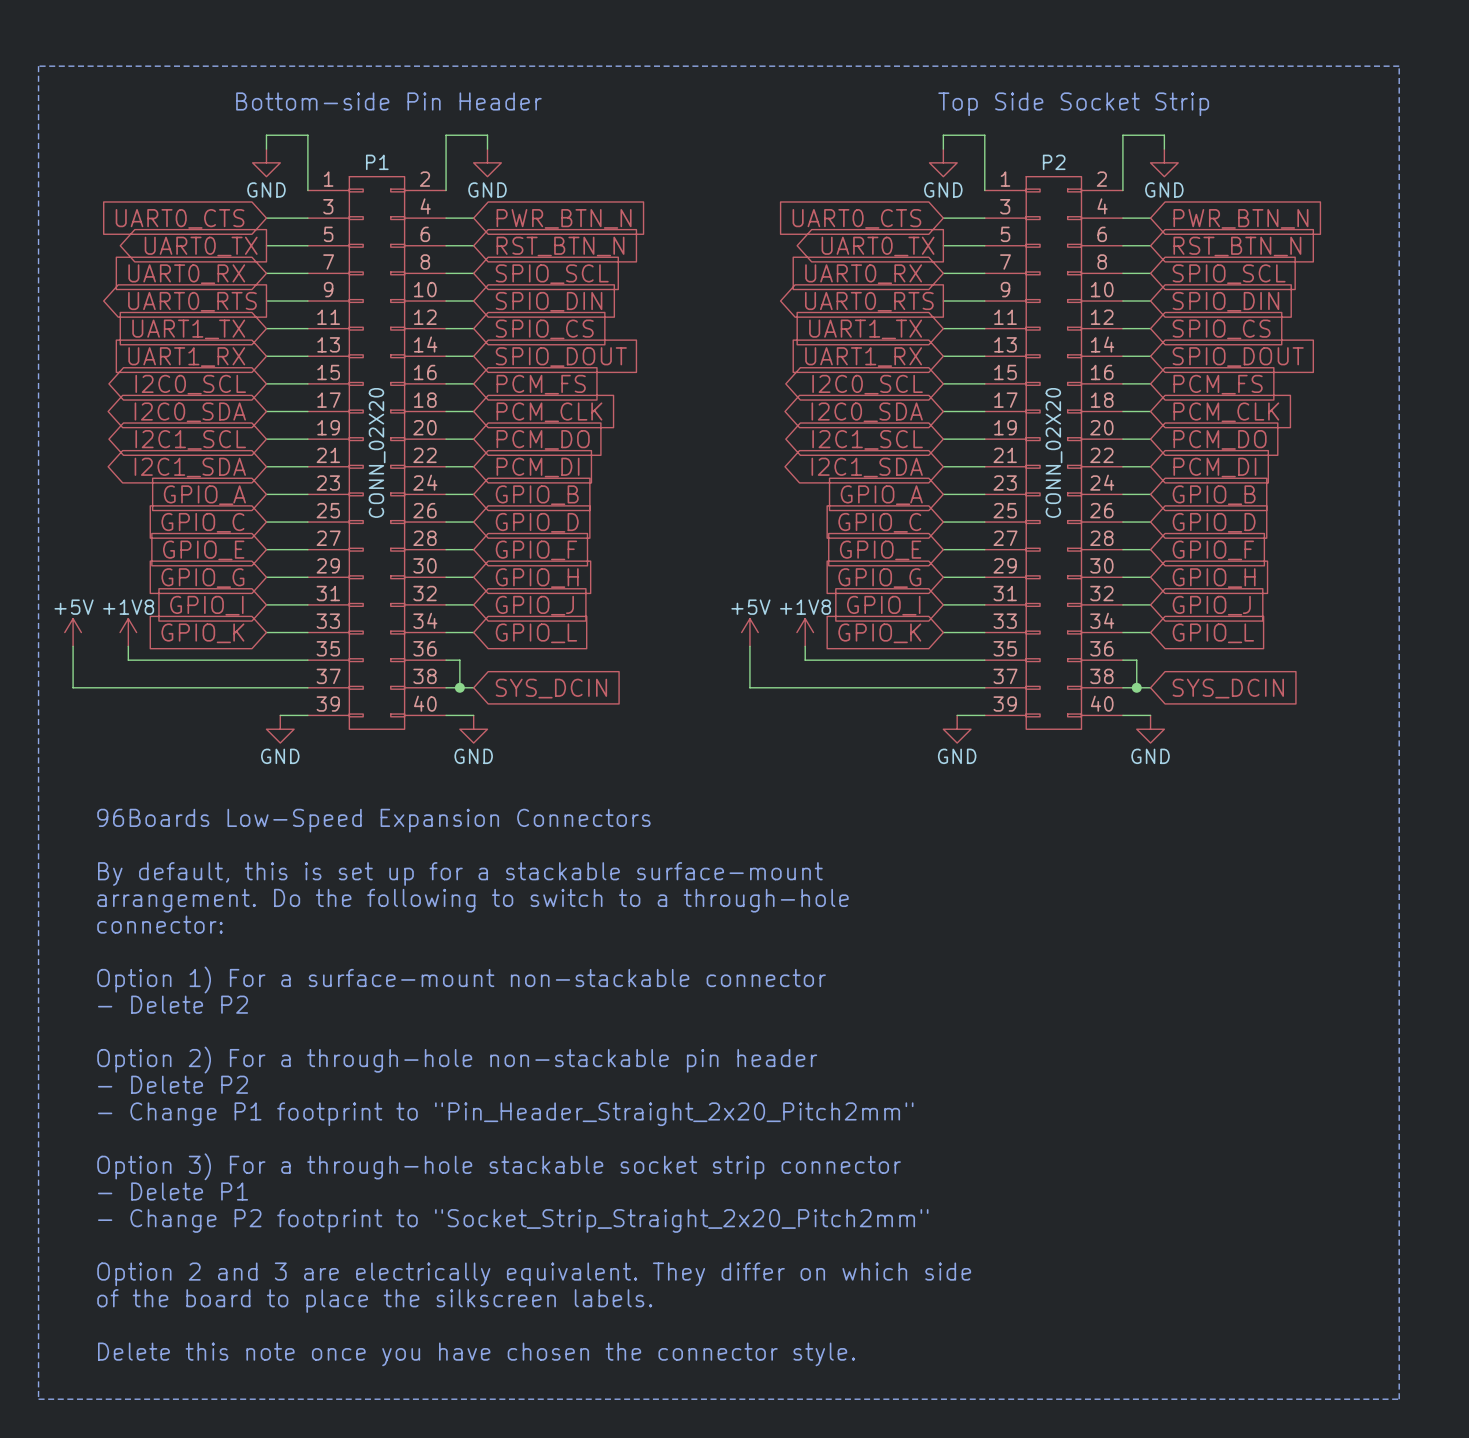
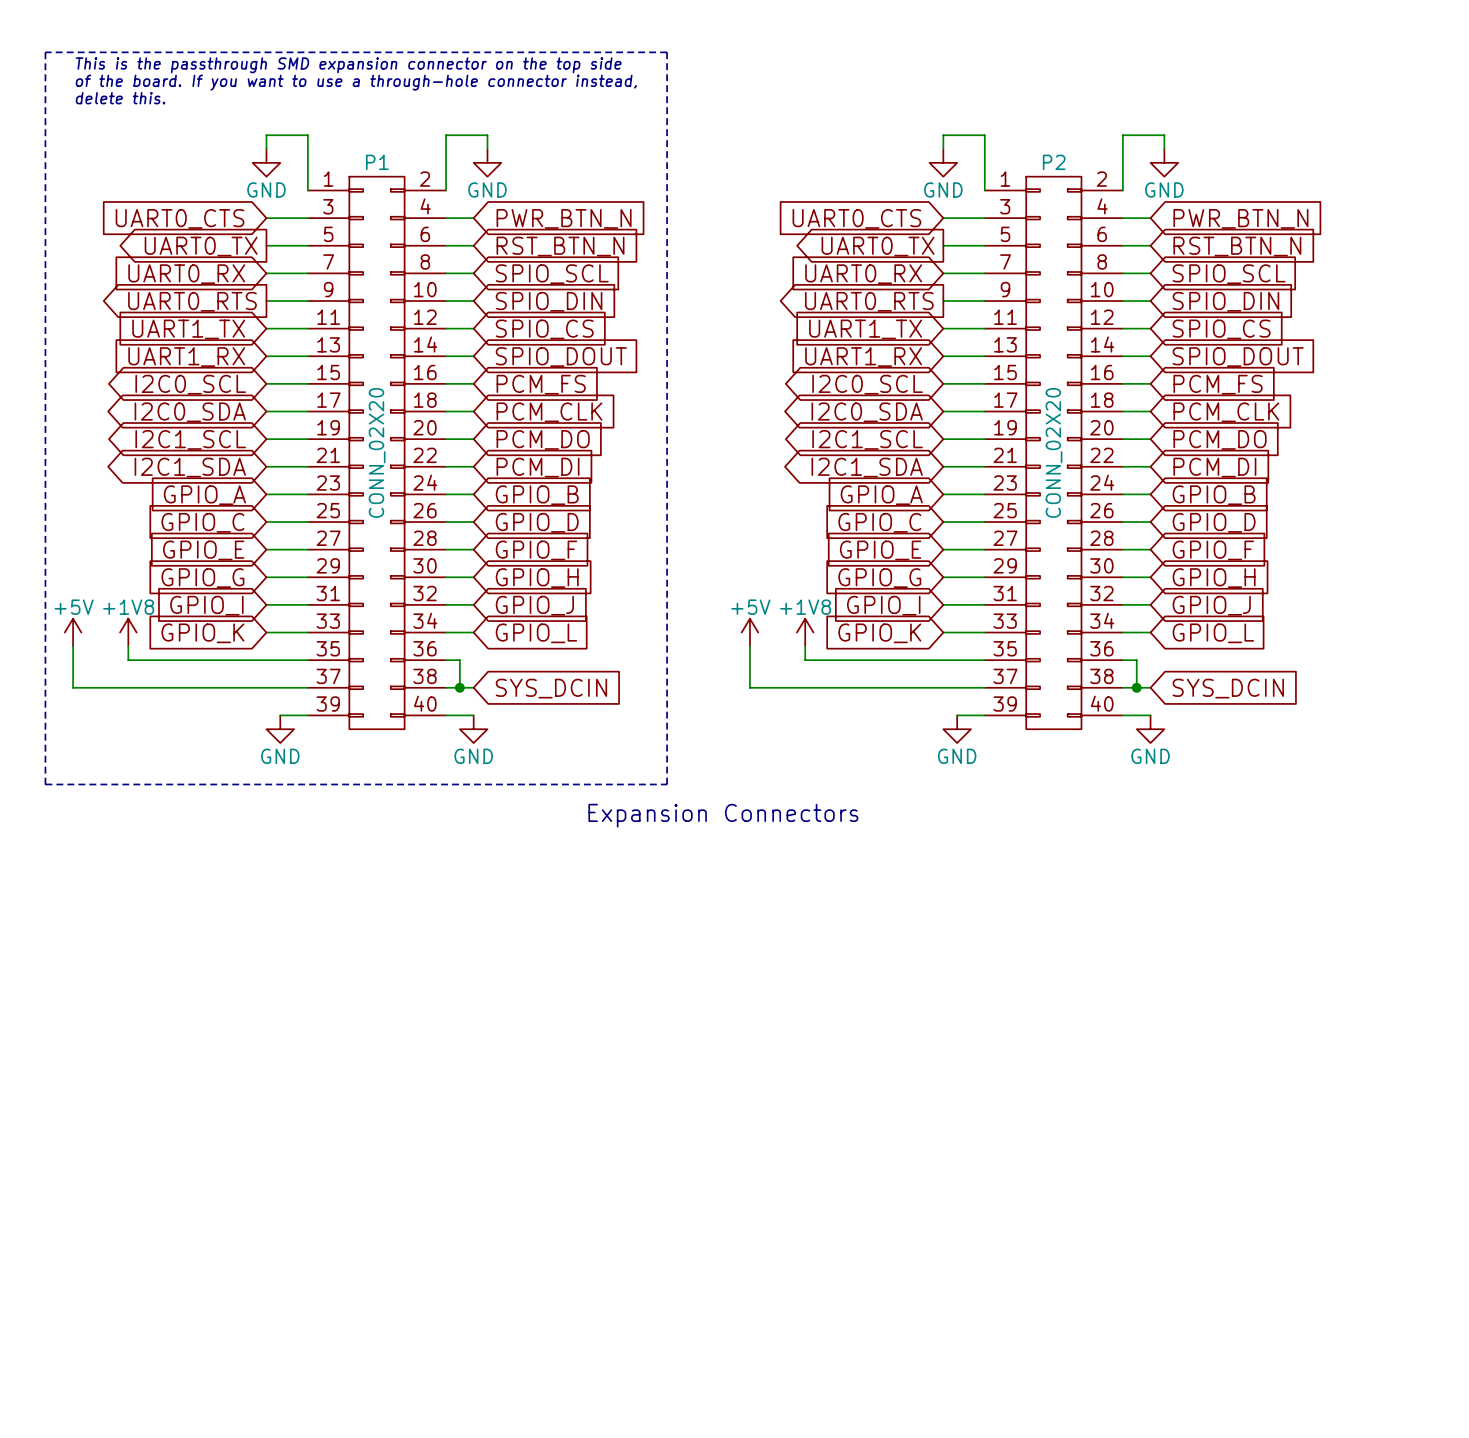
line: none -> (45, 52) (667, 52) (667, 784) (45, 784) (45, 52)
text: none -> This is the passthrough SMD expansion connector on the top side (348, 65)
line: (38, 66) (38, 1399) (1399, 1399) (1399, 66) (38, 66) -> none
text: none -> of the board. If you want to use a through-hole connector instead, (356, 82)
text: none -> delete this. (120, 98)
text: Bottom-side Pin Header (388, 101) -> none
text: Top Side Socket Strip (1073, 104) -> none
text: none -> Expansion Connectors (723, 815)
text: 96Boards Low-Speed Expansion Connectors (373, 820) -> none
text: By default, this is set up for a stackable surface-mount (460, 874) -> none
text: arrangement. Do the following to switch to a through-hole (472, 900) -> none
text: connector: (160, 924) -> none
text: Option 1) For a surface-mount non-stackable connector (461, 979) -> none
text: - Delete P2 (173, 1004) -> none
text: Option 2) For a through-hole non-stackable pin header (457, 1060) -> none
text: - Delete P2 (173, 1084) -> none
text: - Change P1 footprint to "Pin_Header_Straight_2x20_Pitch2mm" (505, 1114) -> none
text: Option 3) For a through-hole stackable socket strip connector (499, 1166) -> none
text: - Delete P1 (173, 1191) -> none
text: - Change P2 footprint to "Socket_Strip_Straight_2x20_Pitch2mm" (513, 1220) -> none
text: Option 2 and 3 are electrically equivalent. They differ on which side (534, 1274) -> none
text: of the board to place the silkscreen labels. (374, 1301) -> none
text: Delete this note once you have chosen the connector style. (476, 1354) -> none

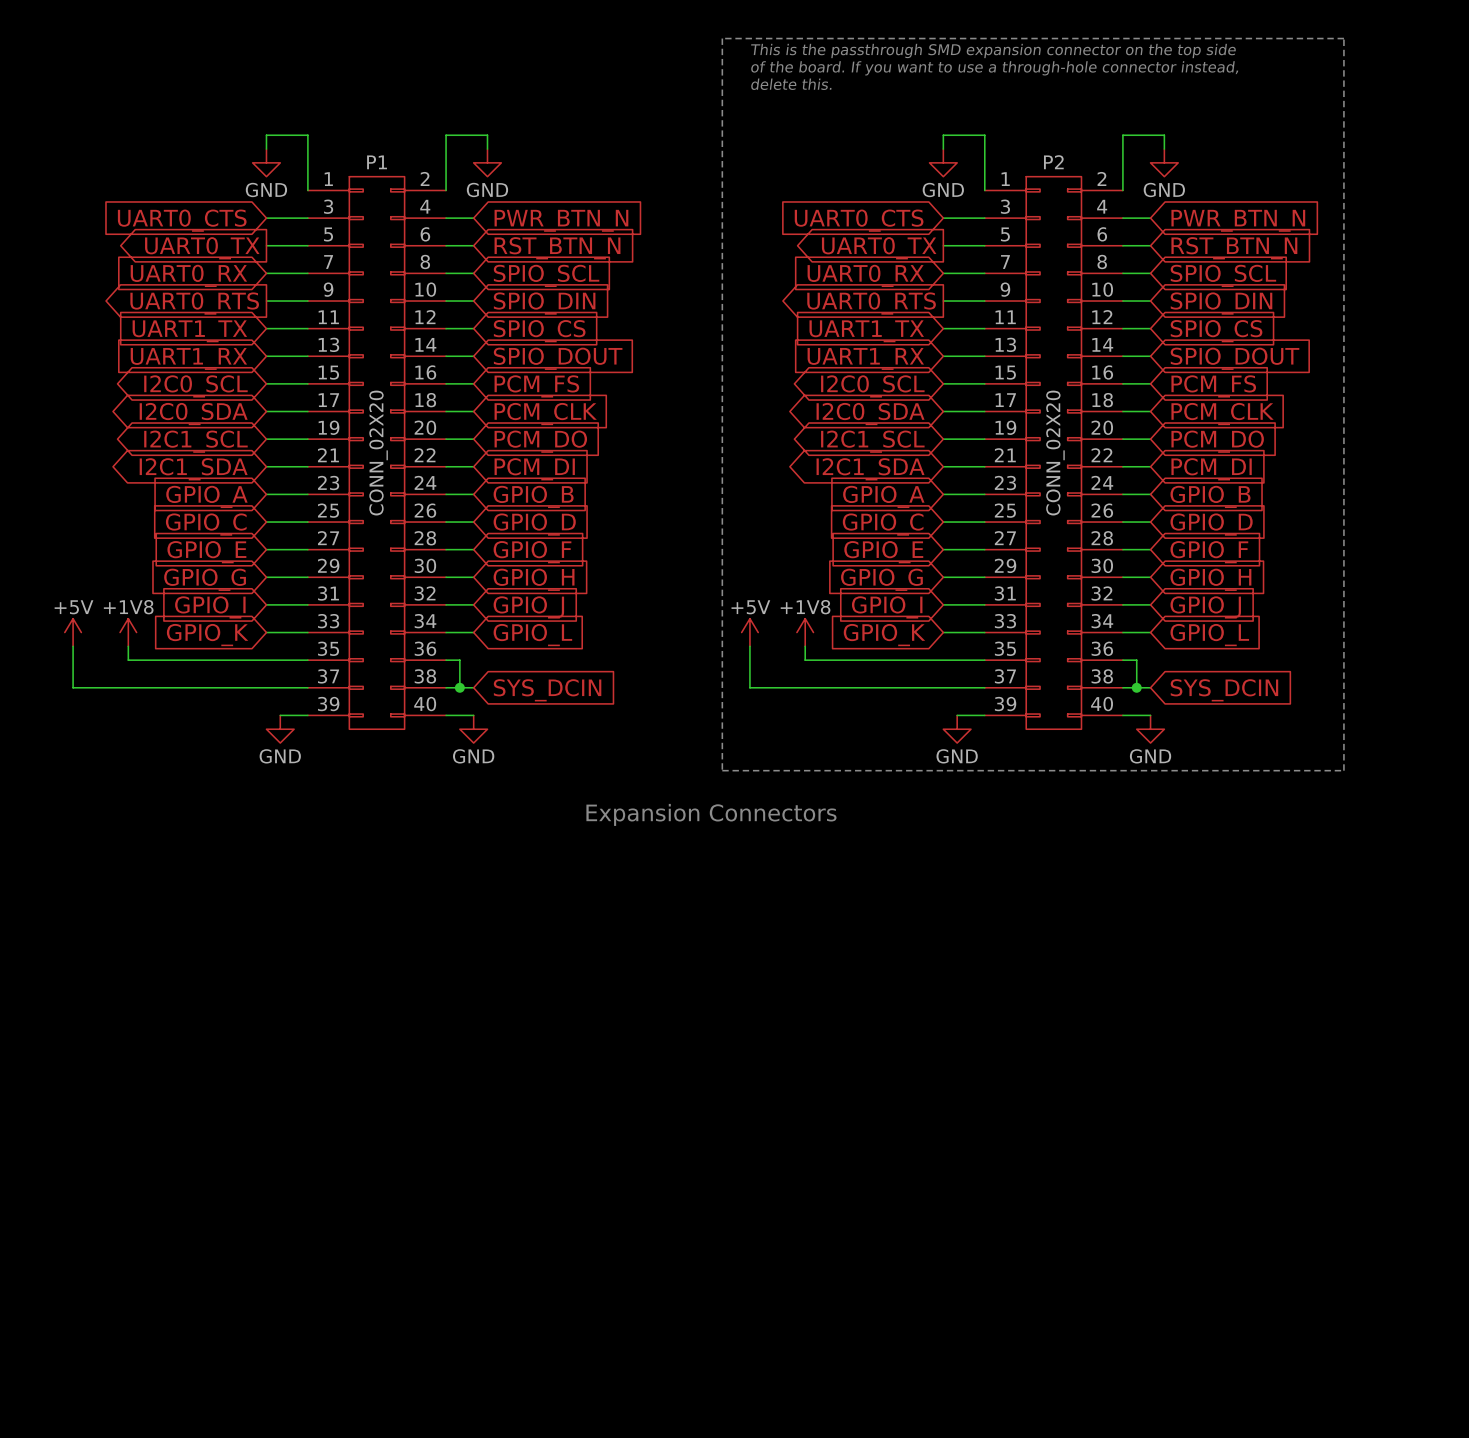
line: none -> (722, 38) (1343, 38) (1343, 770) (722, 770) (722, 38)
text: none -> This is the passthrough SMD expansion connector on the top side (993, 50)
line: (45, 52) (667, 52) (667, 784) (45, 784) (45, 52) -> none
text: This is the passthrough SMD expansion connector on the top side (348, 65) -> none
text: none -> of the board. If you want to use a through-hole connector instead, (994, 68)
text: of the board. If you want to use a through-hole connector instead, (356, 82) -> none
text: none -> delete this. (791, 84)
text: delete this. (120, 98) -> none

